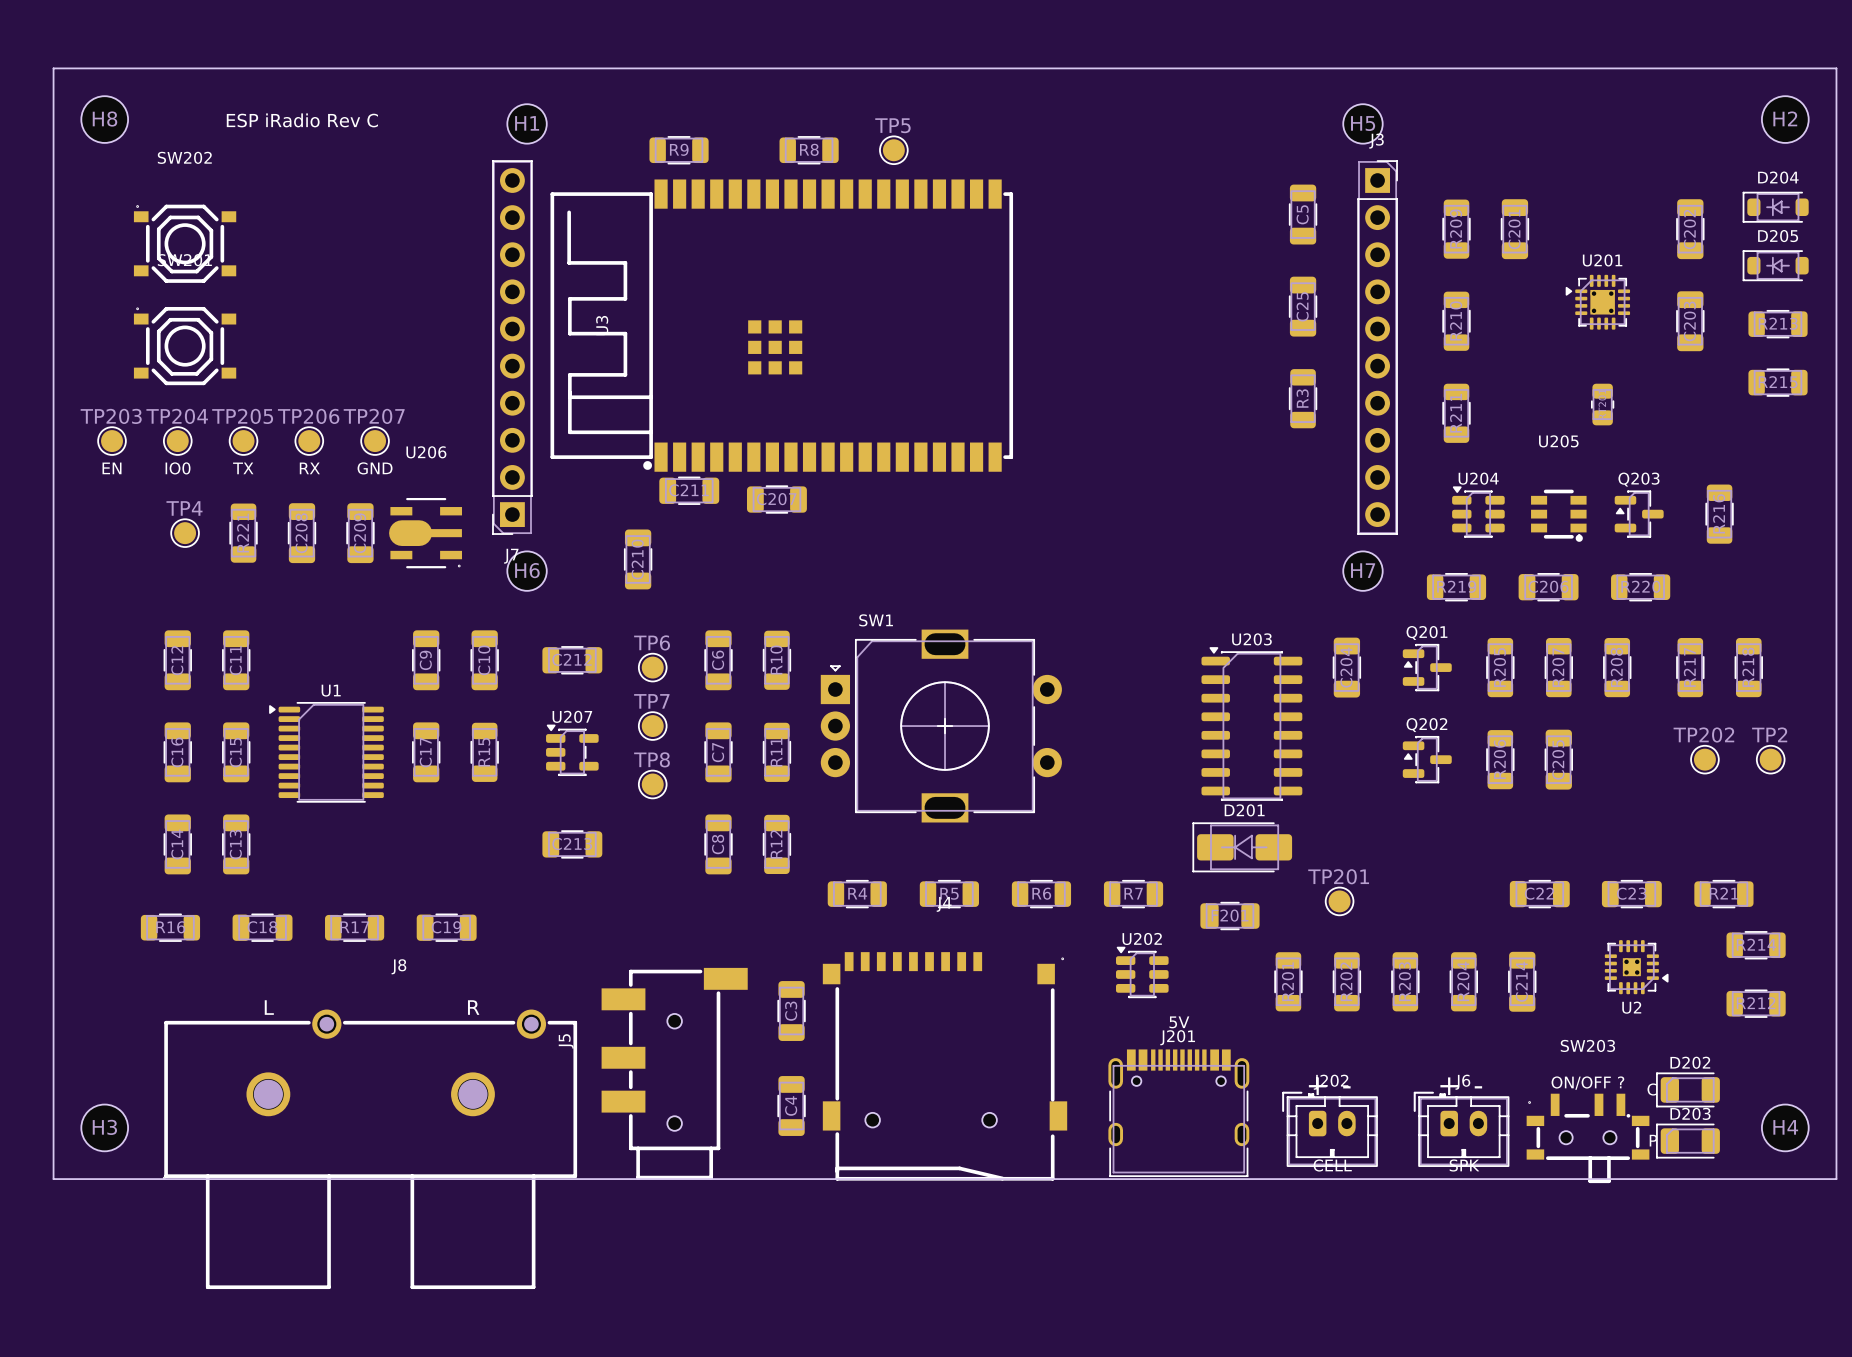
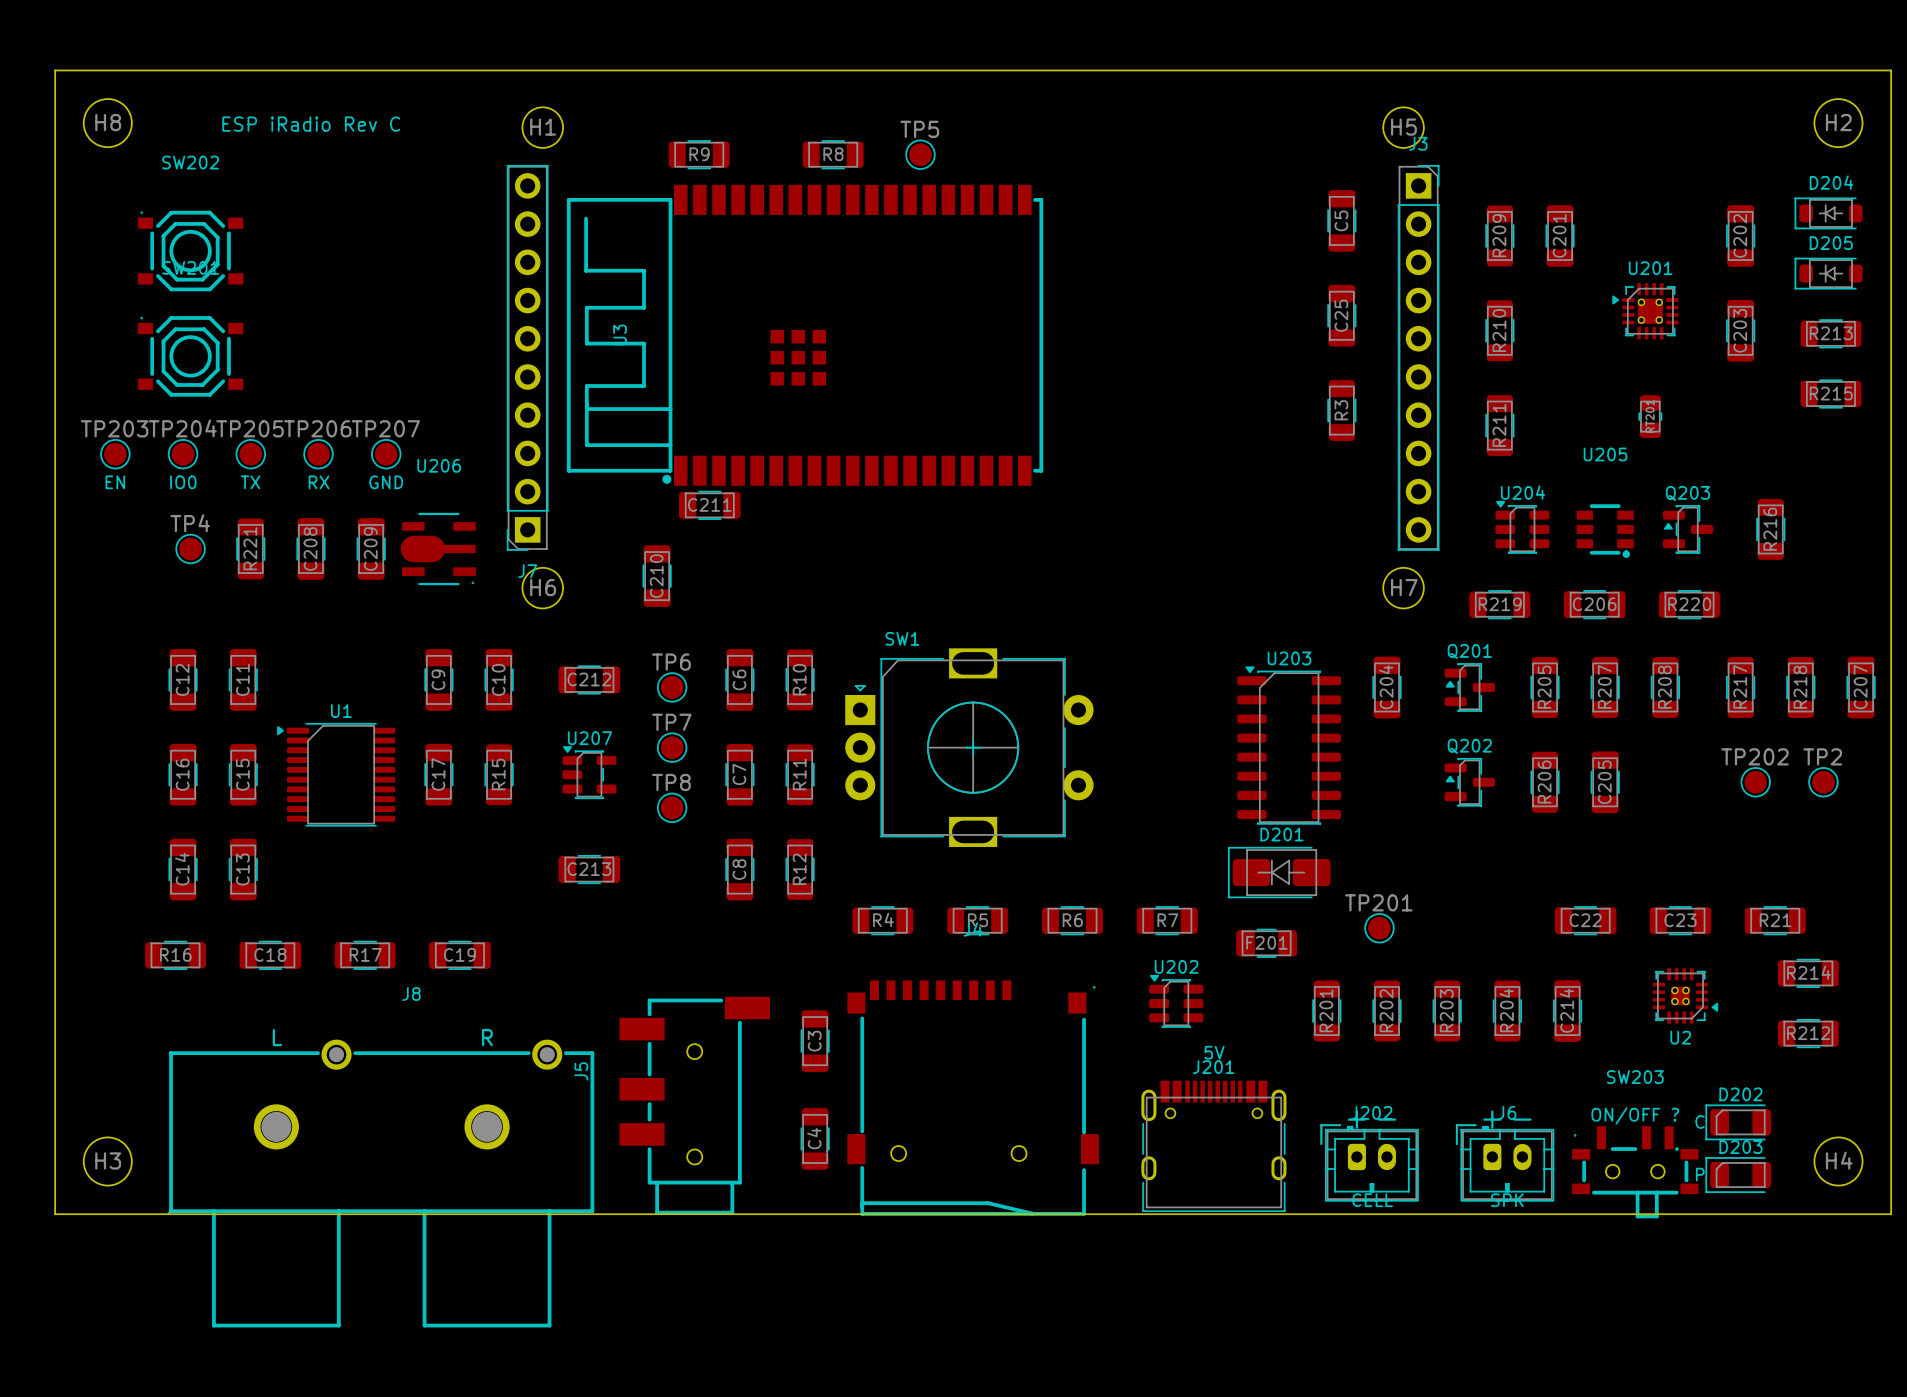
C207 rotation: 0° (776, 499) -> 90° clockwise (1861, 687)
C207 position: (776, 499) -> (1861, 687)

